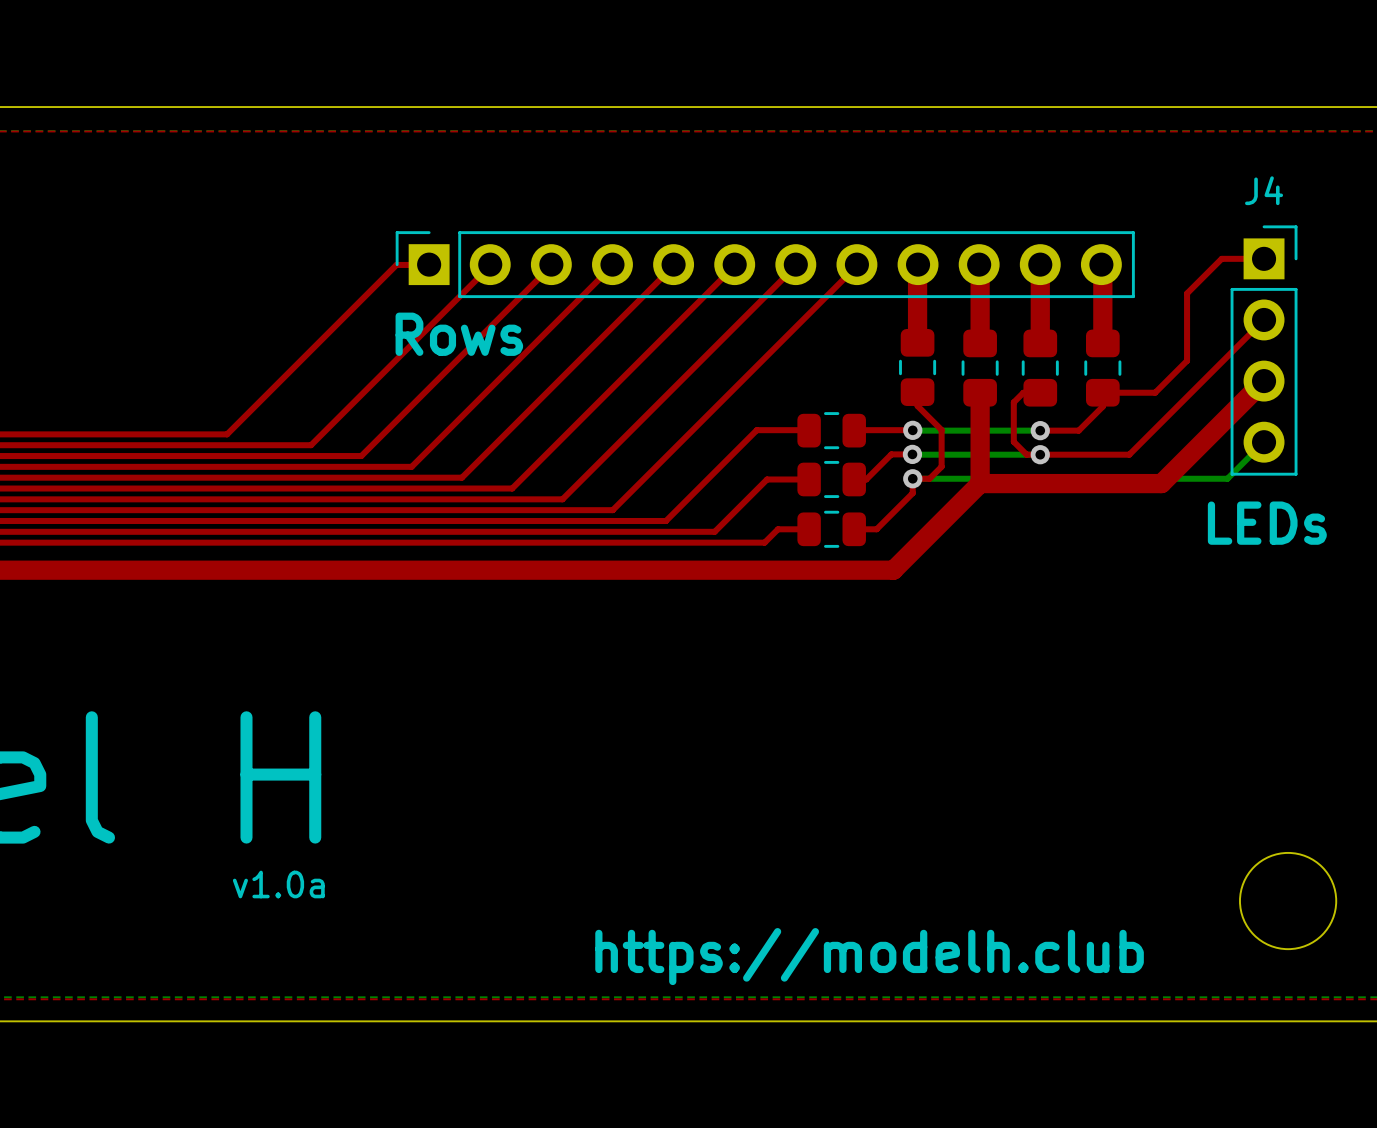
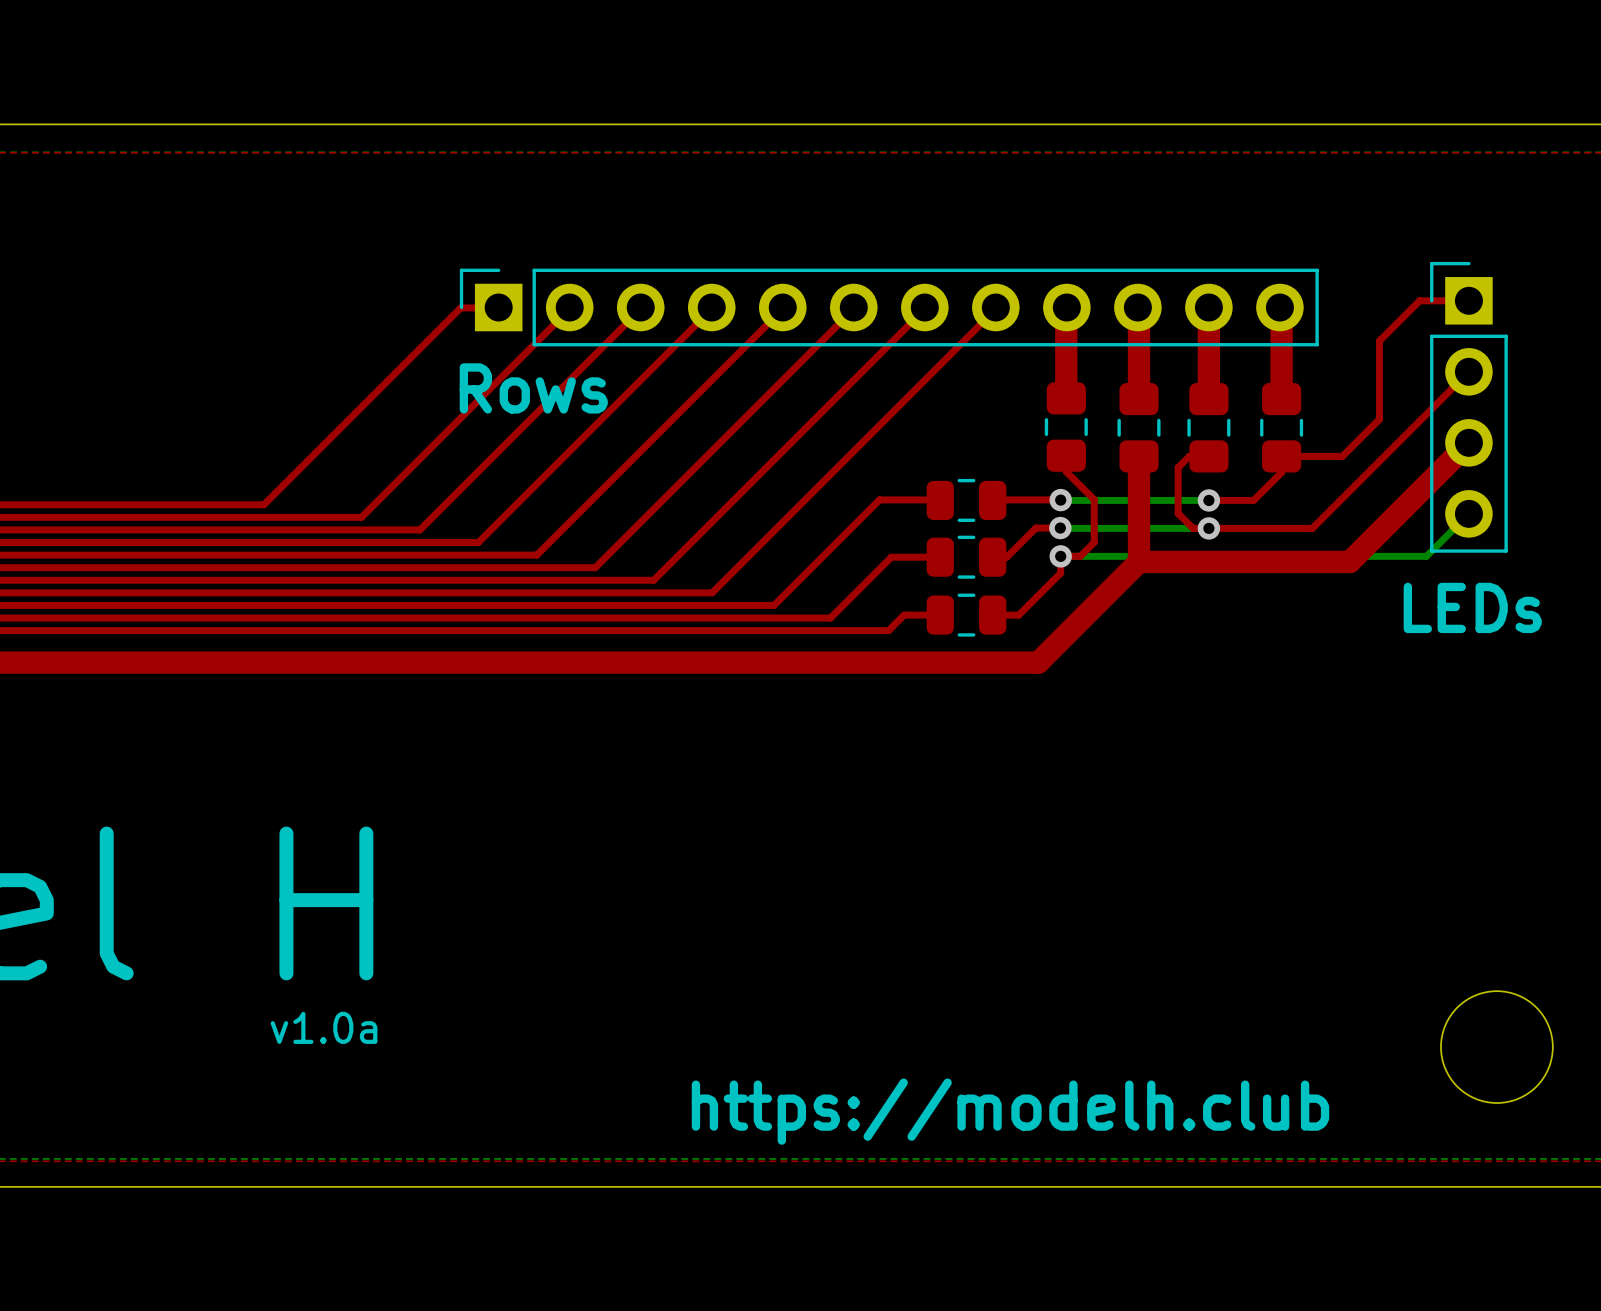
J4: (1264, 350) -> none
part: none -> (1468, 407)

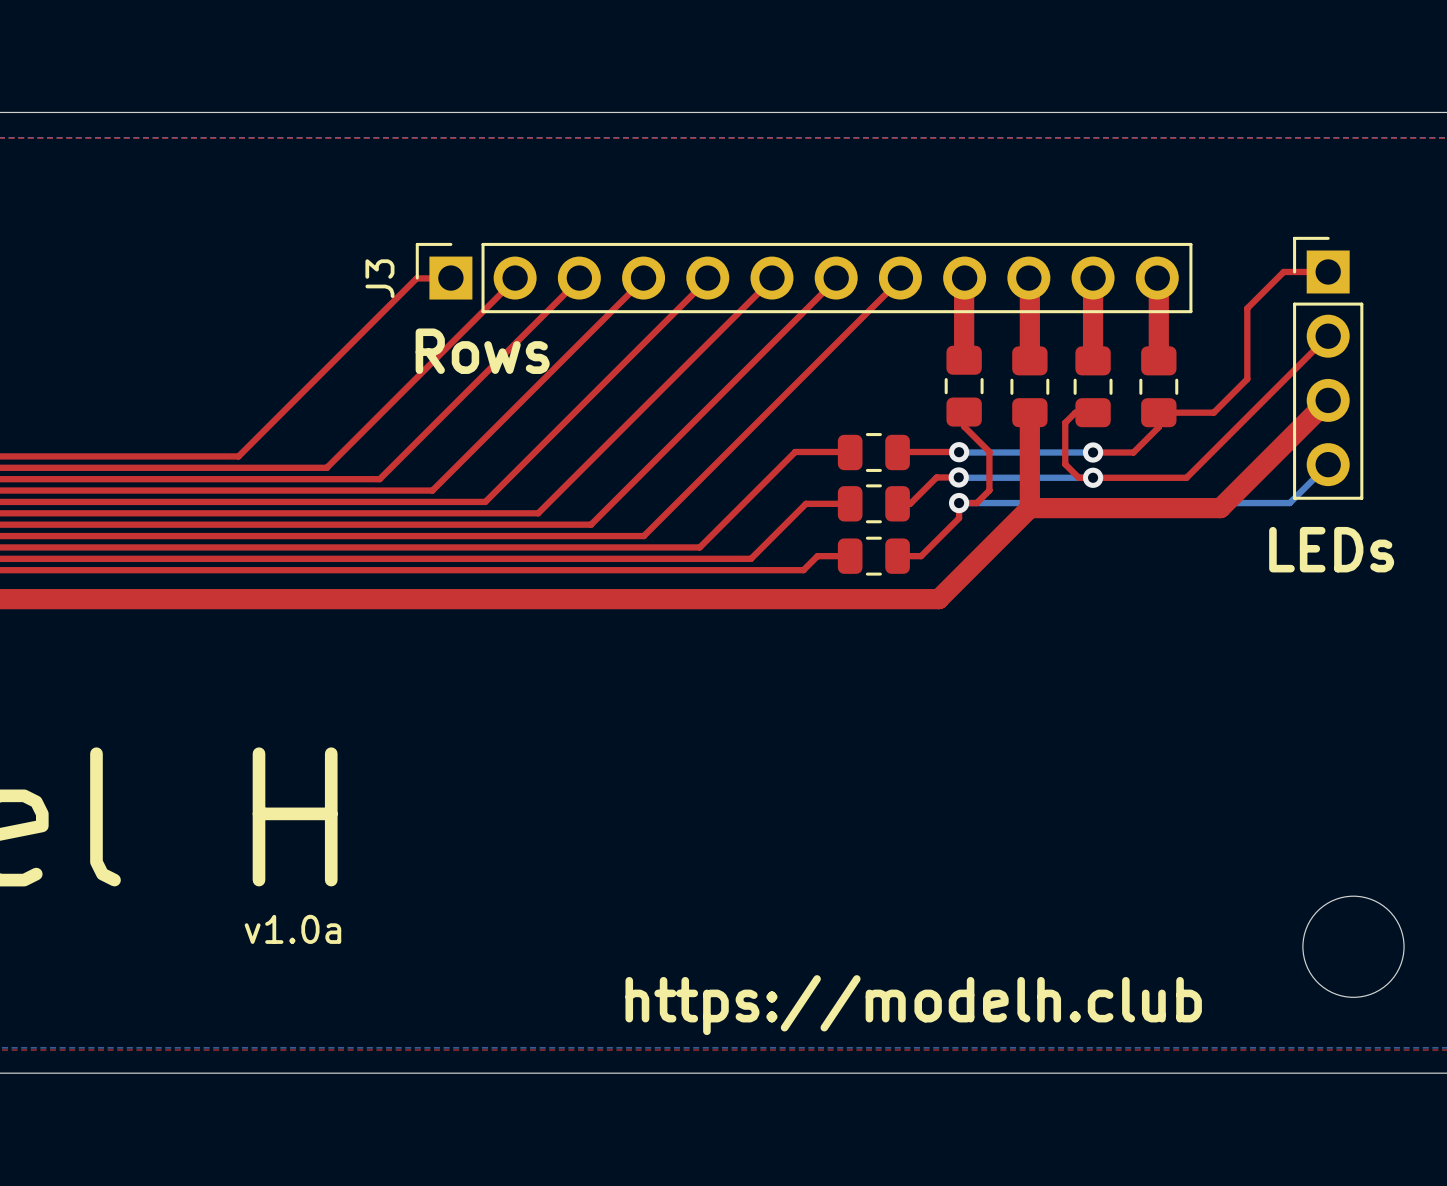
J3 name: none -> J3 (379, 278)

